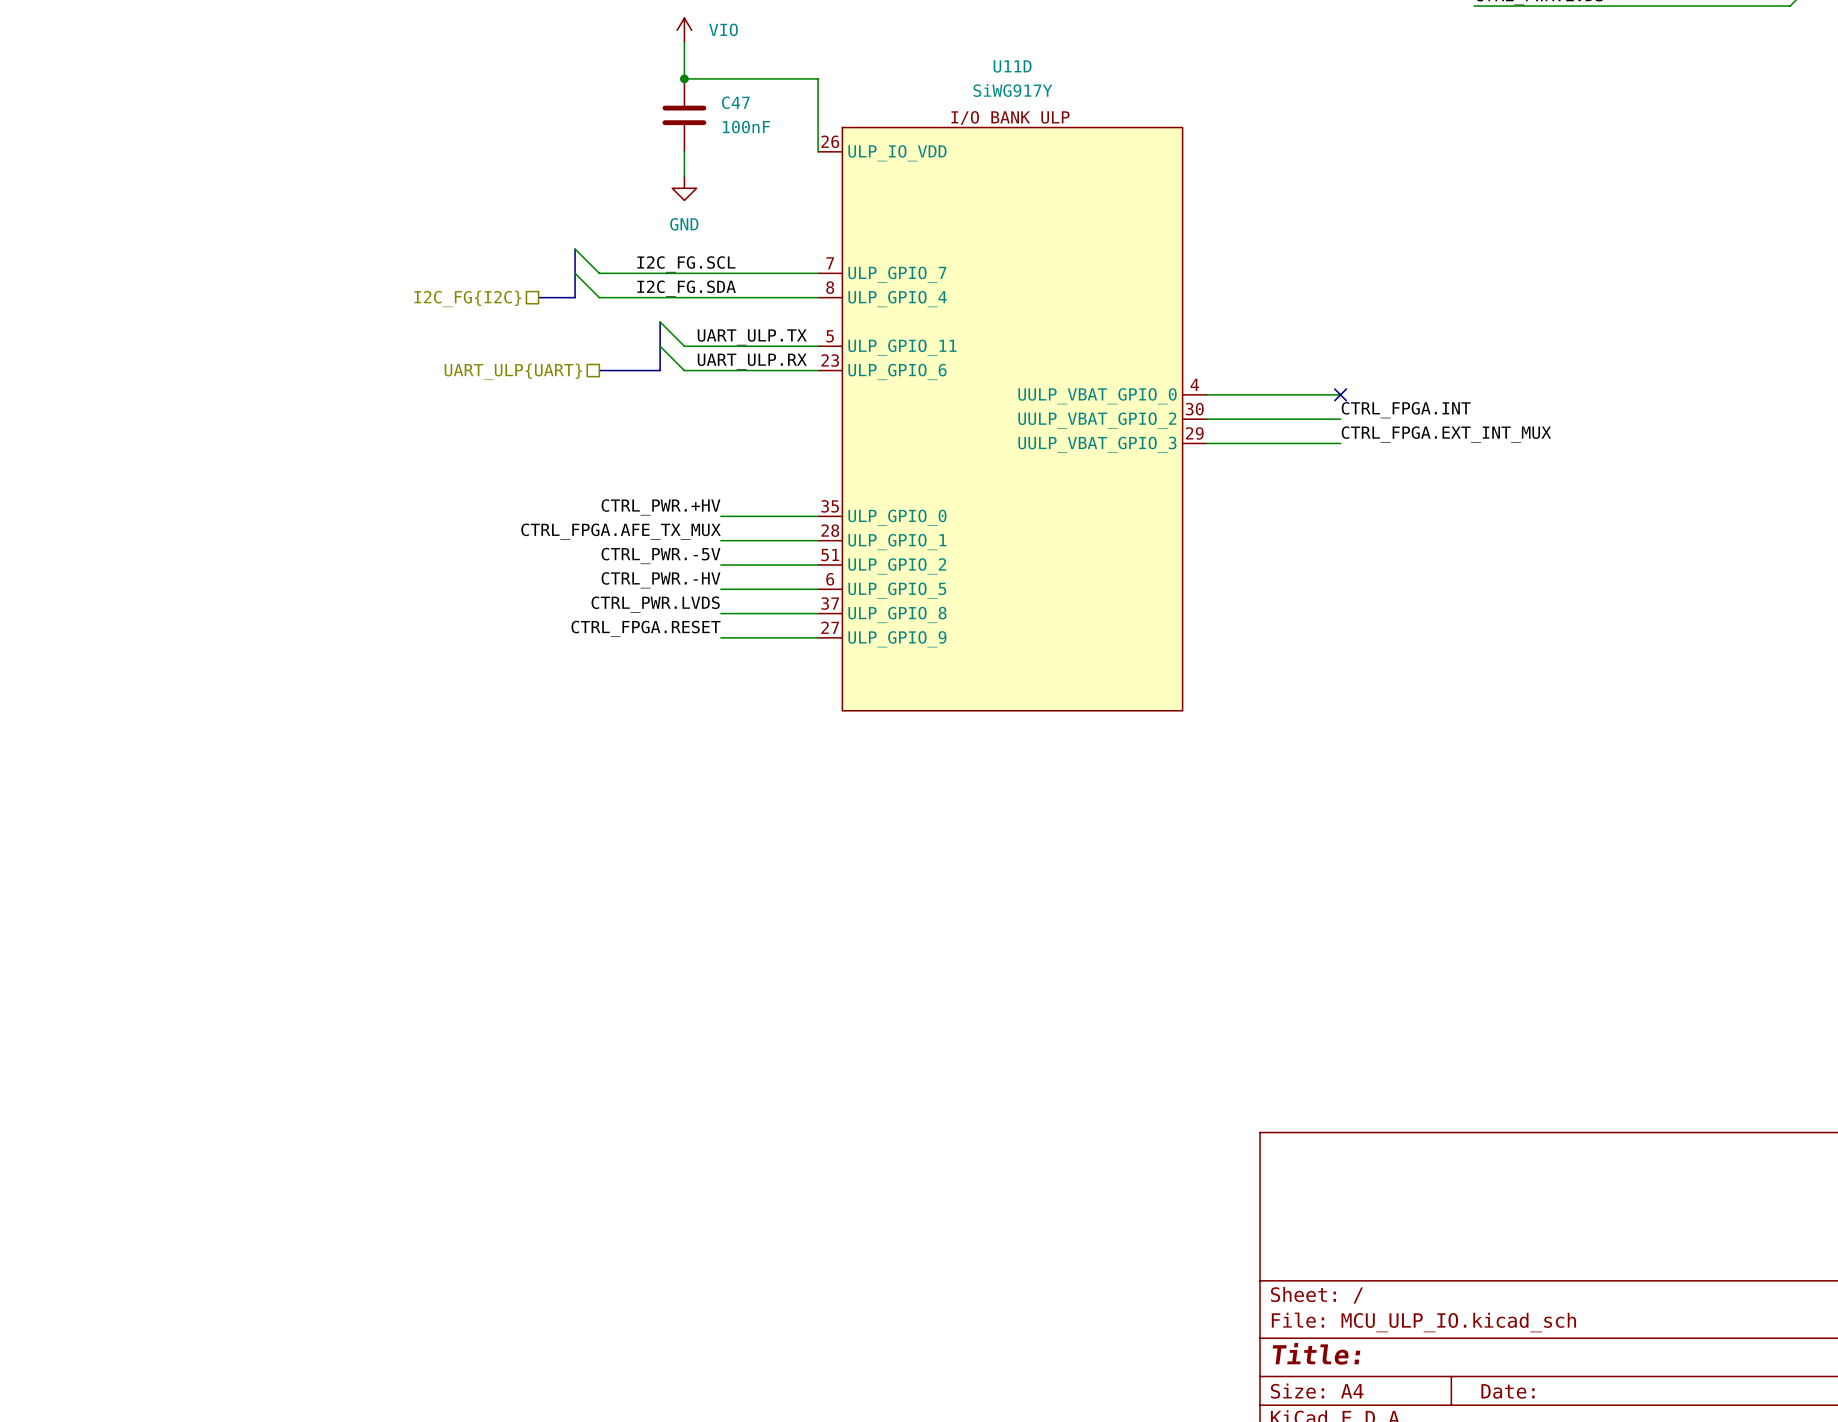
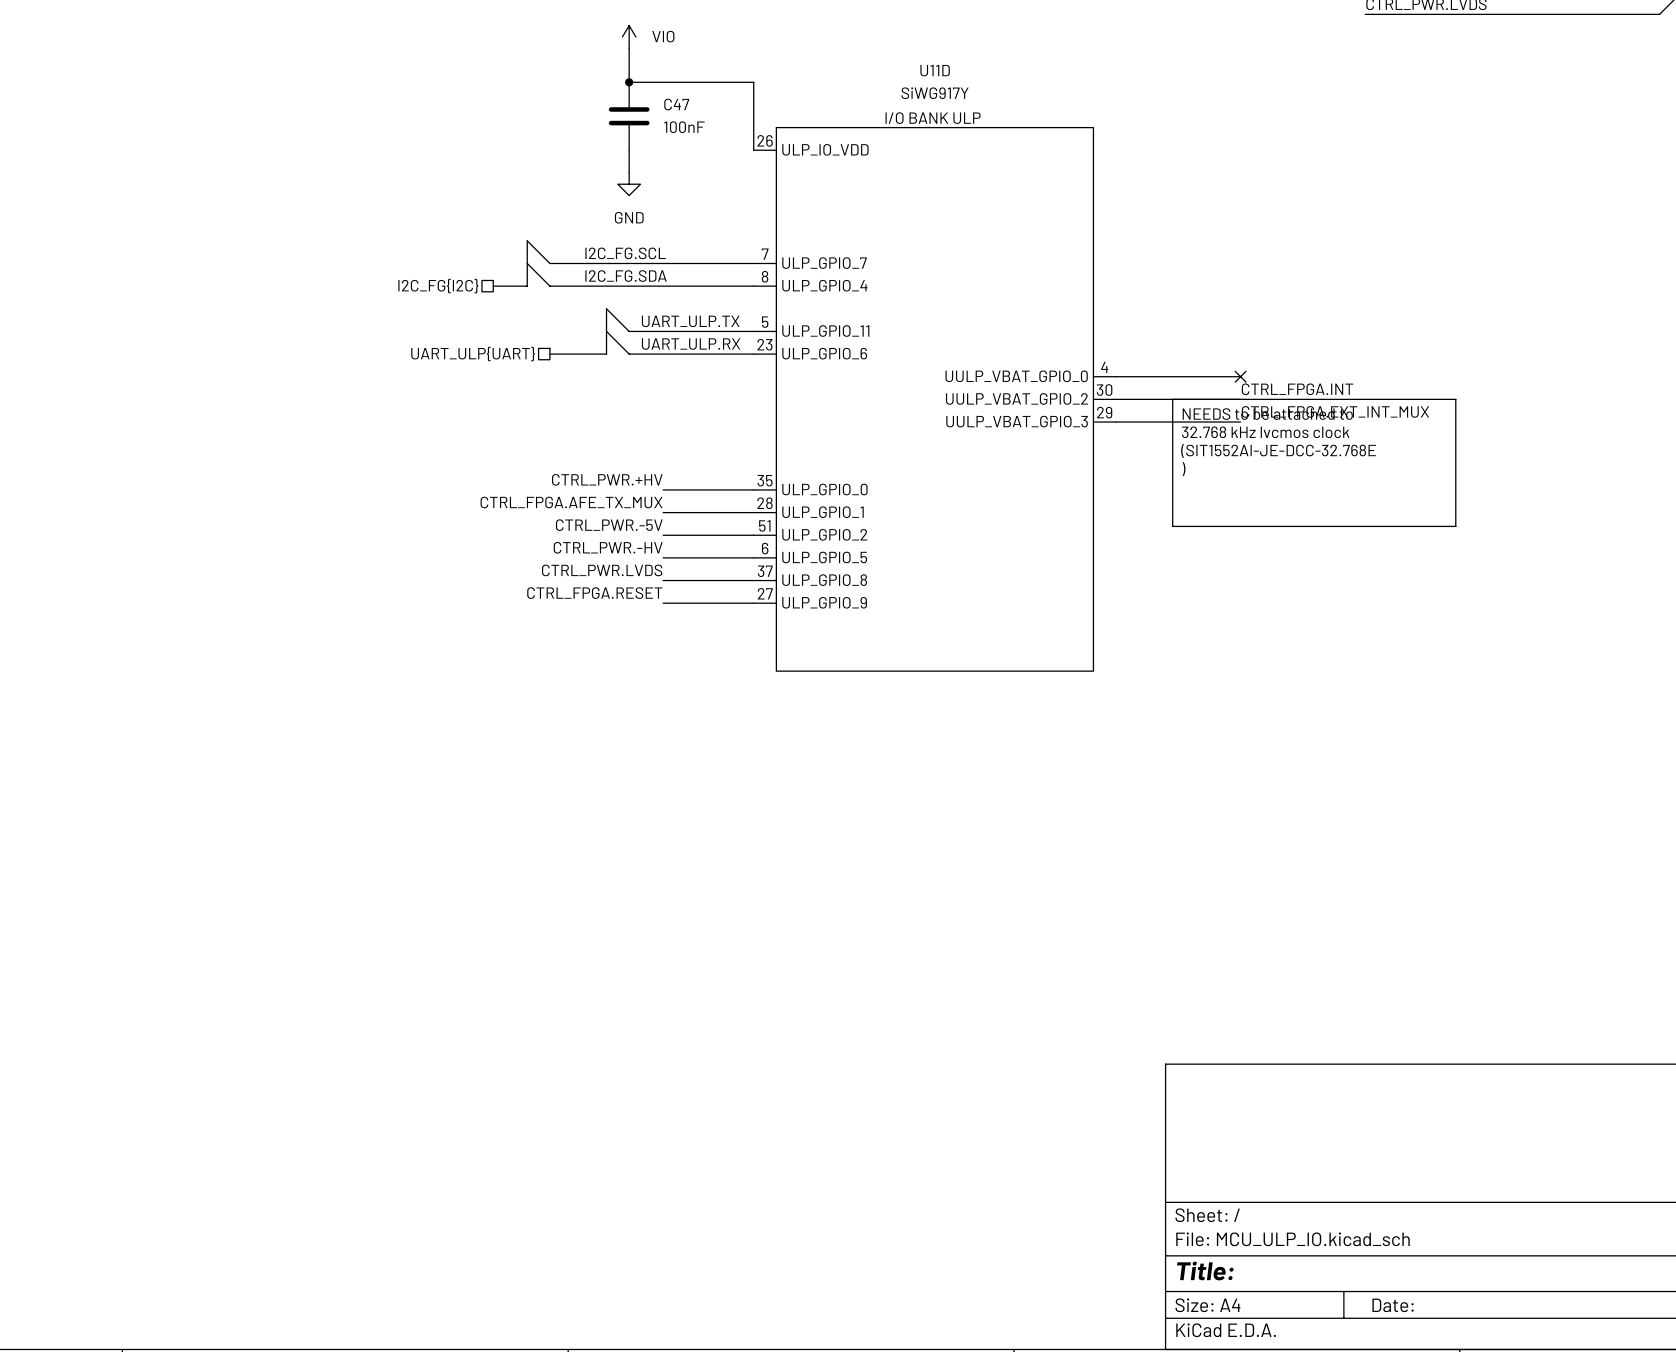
line: none -> (1172, 399) (1455, 399) (1455, 526) (1172, 526) (1172, 399)
text: none -> NEEDS to be attached to (1267, 414)
text: none -> 32.768 kHz lvcmos clock (1265, 432)
text: none -> (SIT1552AI-JE-DCC-32.768E (1278, 450)
text: none -> ) (1184, 469)

